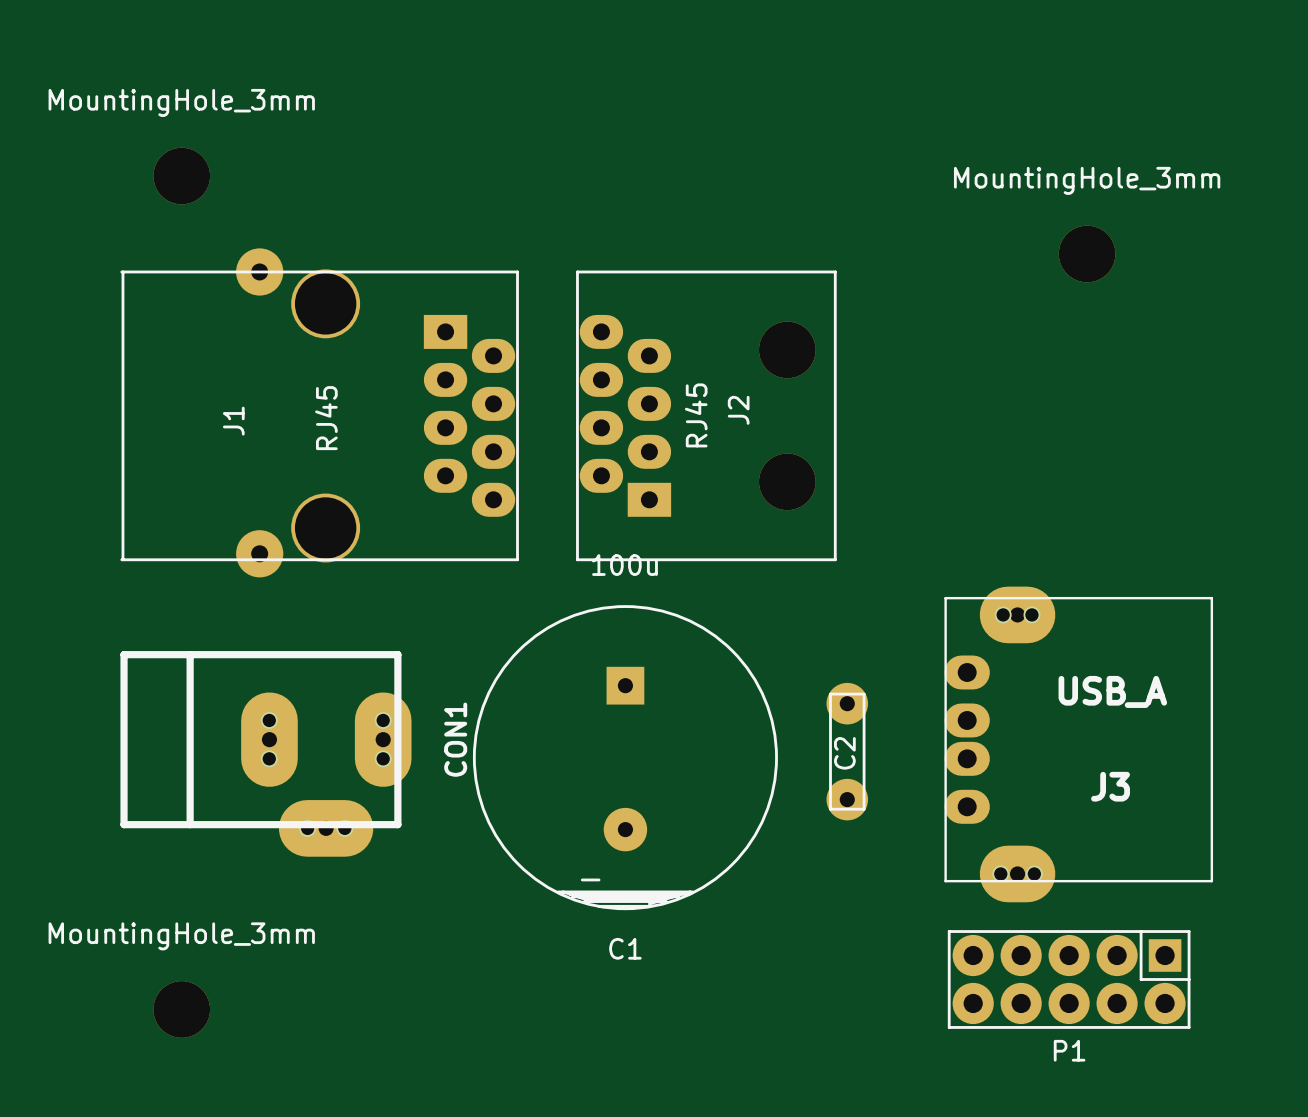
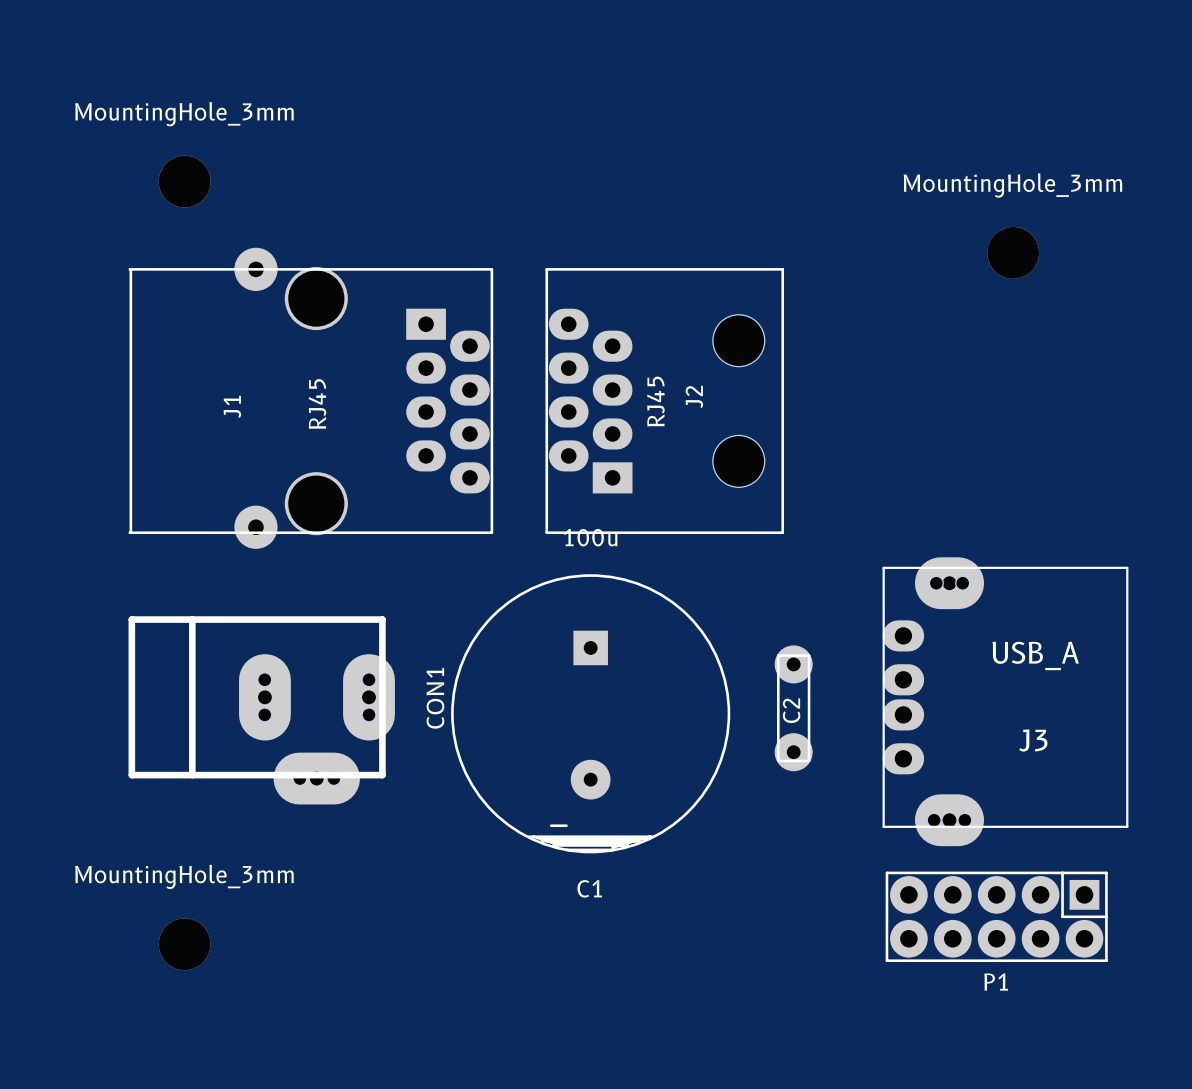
J2 footprint: [576, 270, 837, 562] -> [545, 268, 785, 535]

